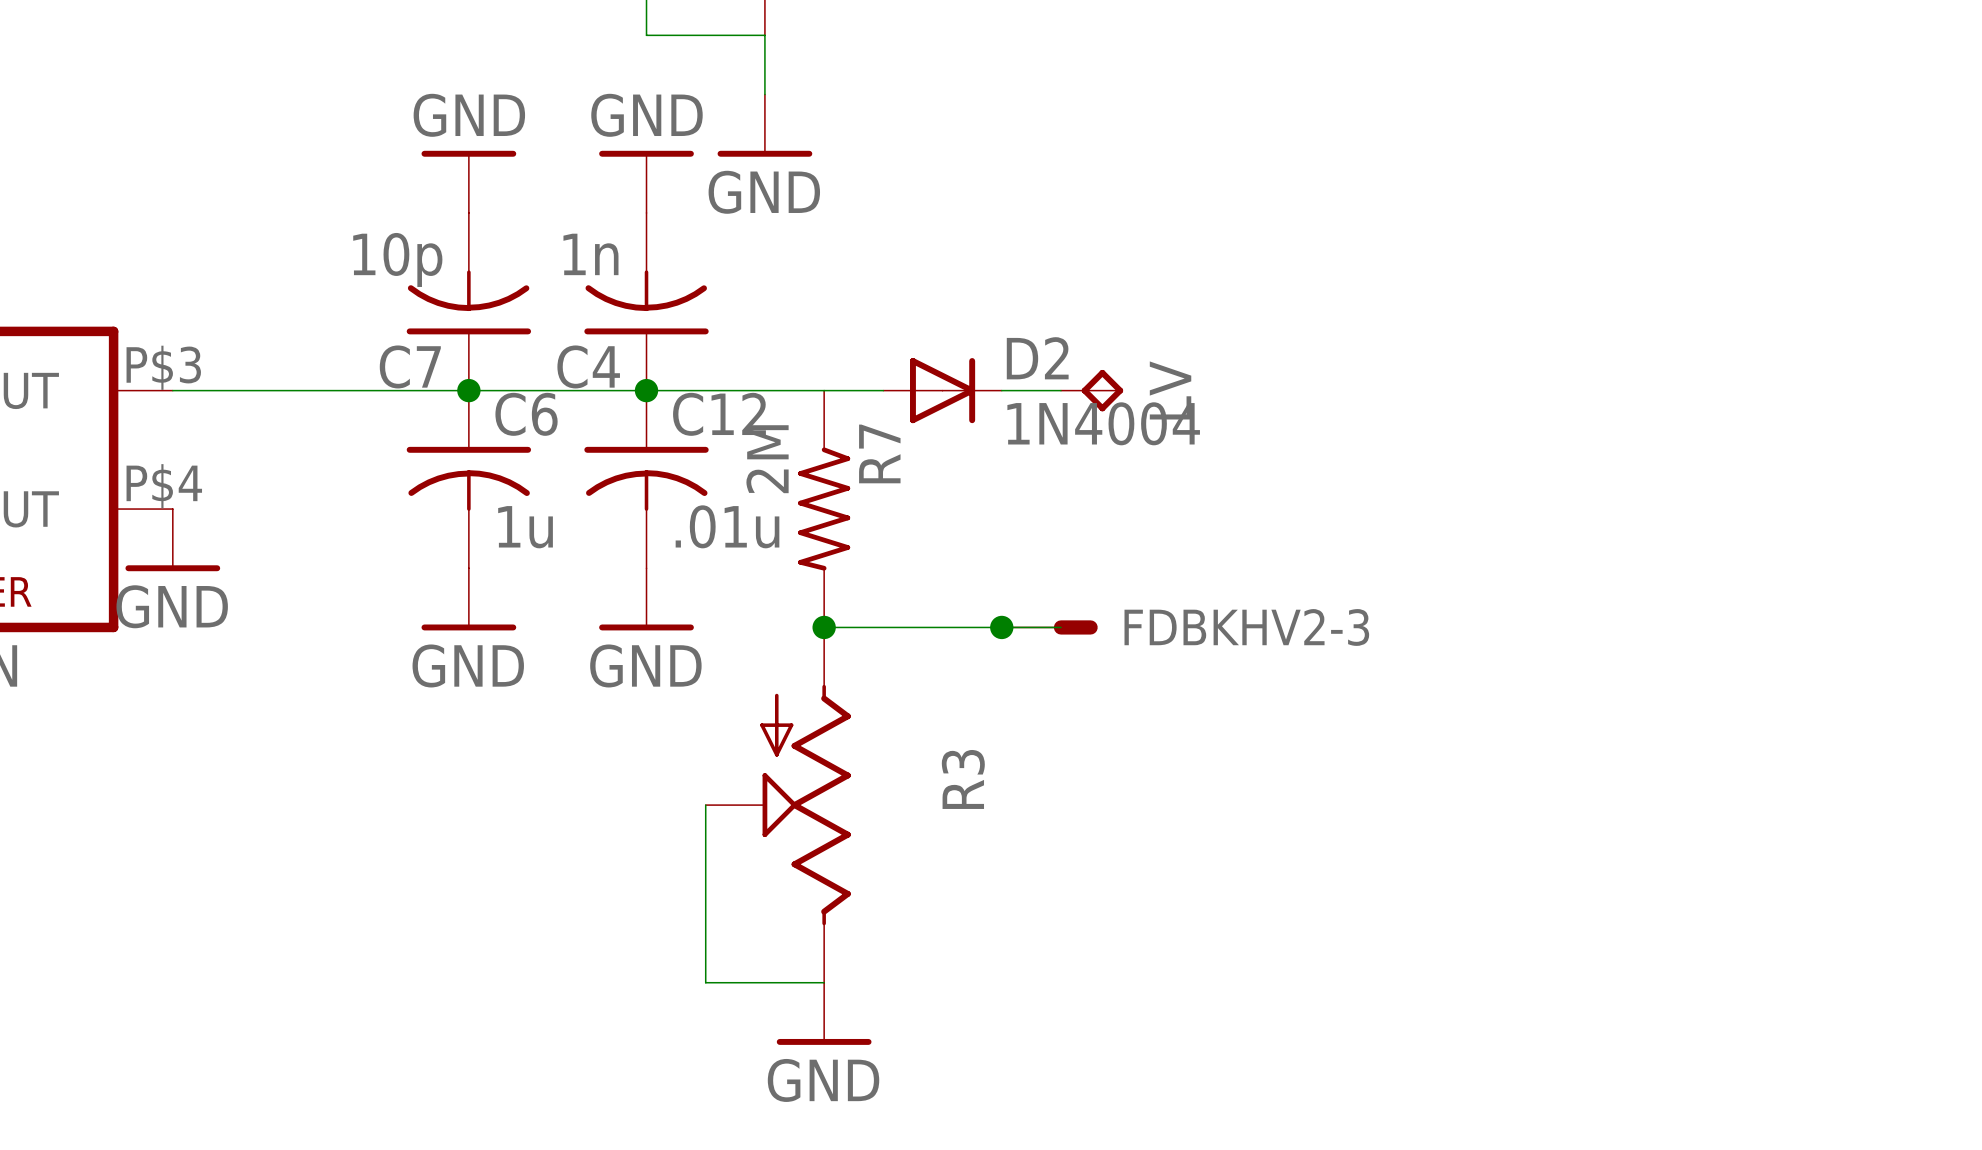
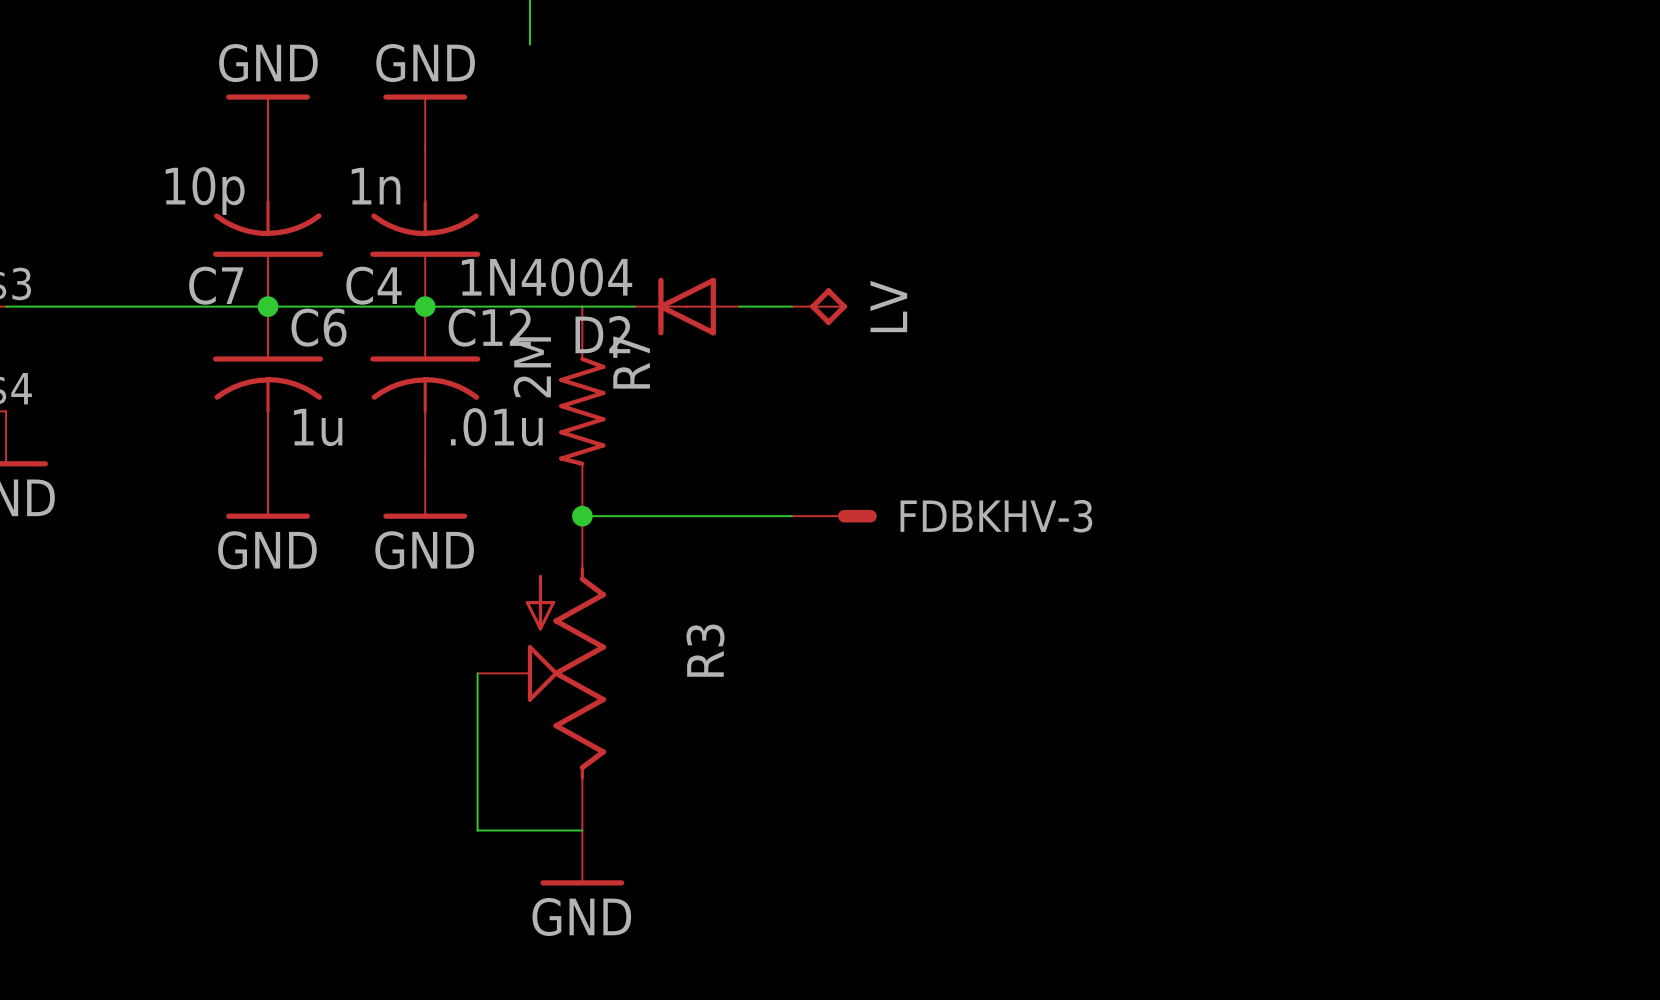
power symbol: GND (764, 125) -> none
D2 rotation: 0° (942, 390) -> 180° (687, 306)
junction: (1001, 627) -> none
FDBKHV2-3: (1049, 627) -> none
FDBKHV-3: none -> (834, 516)

